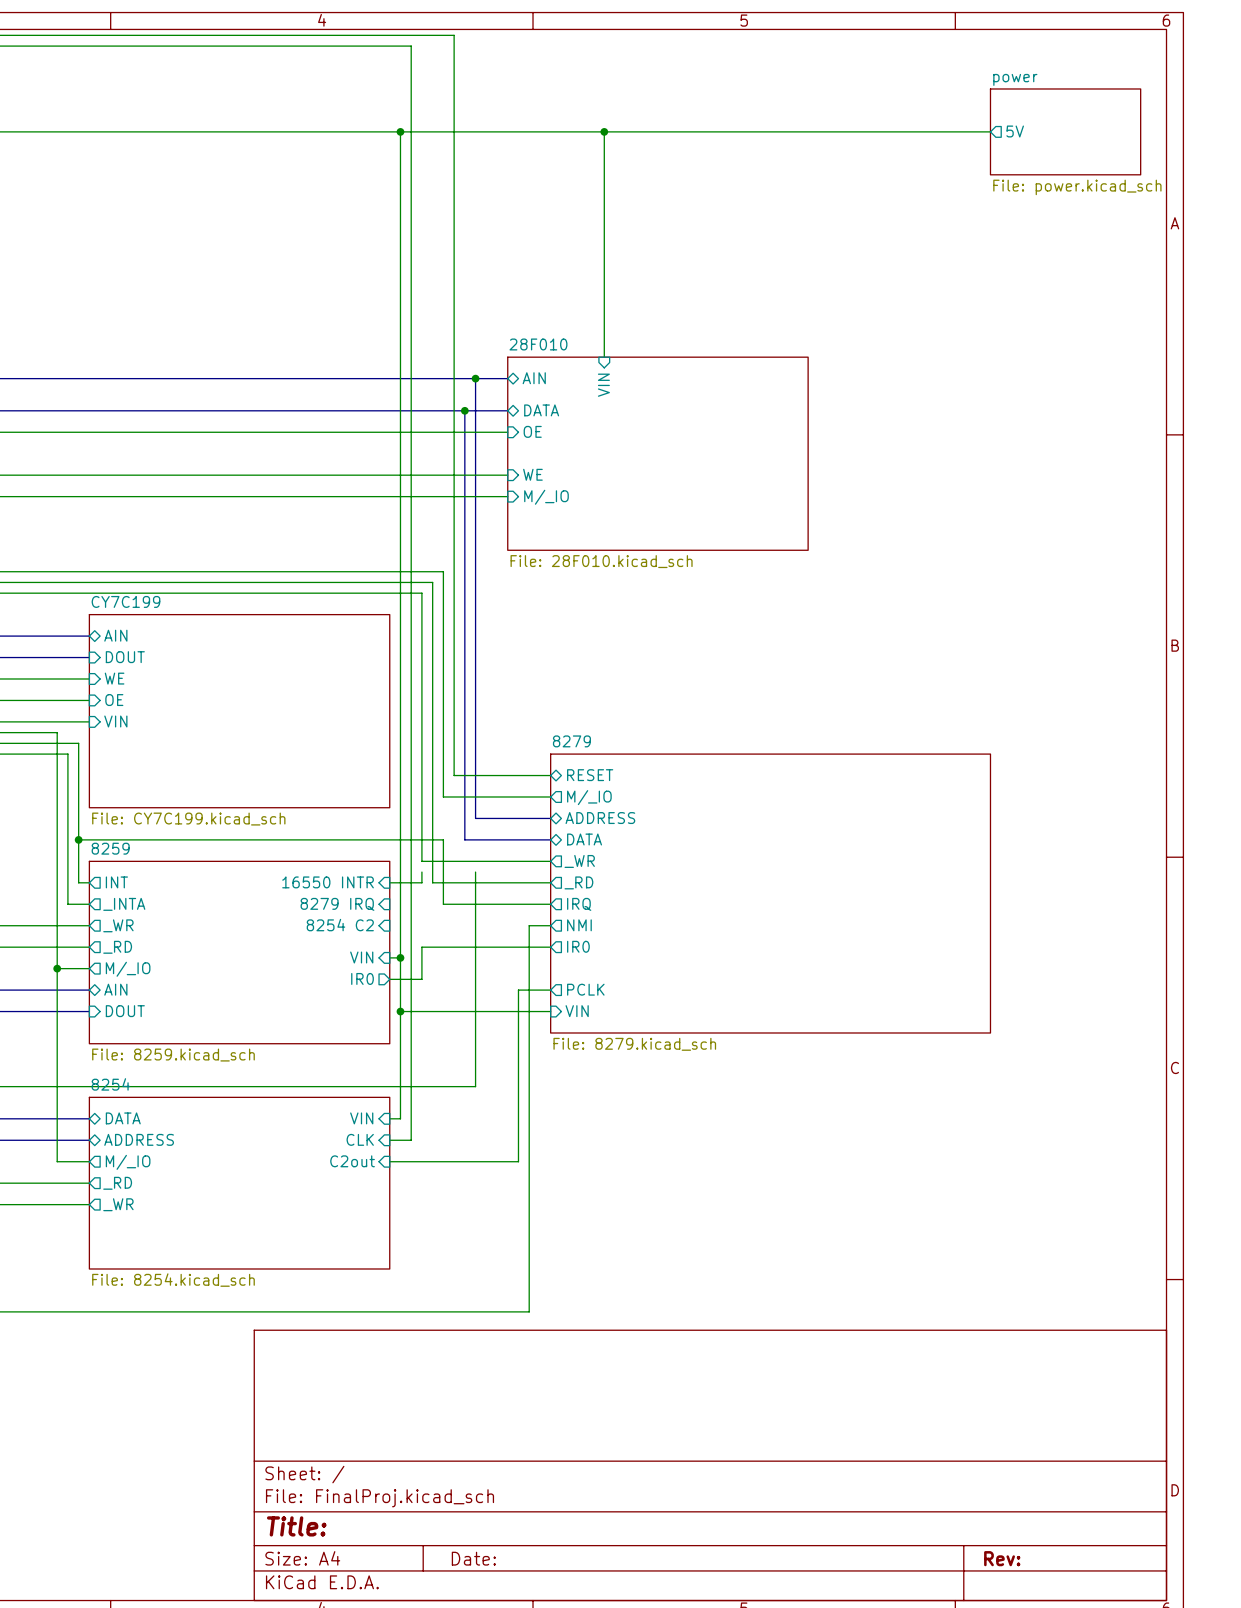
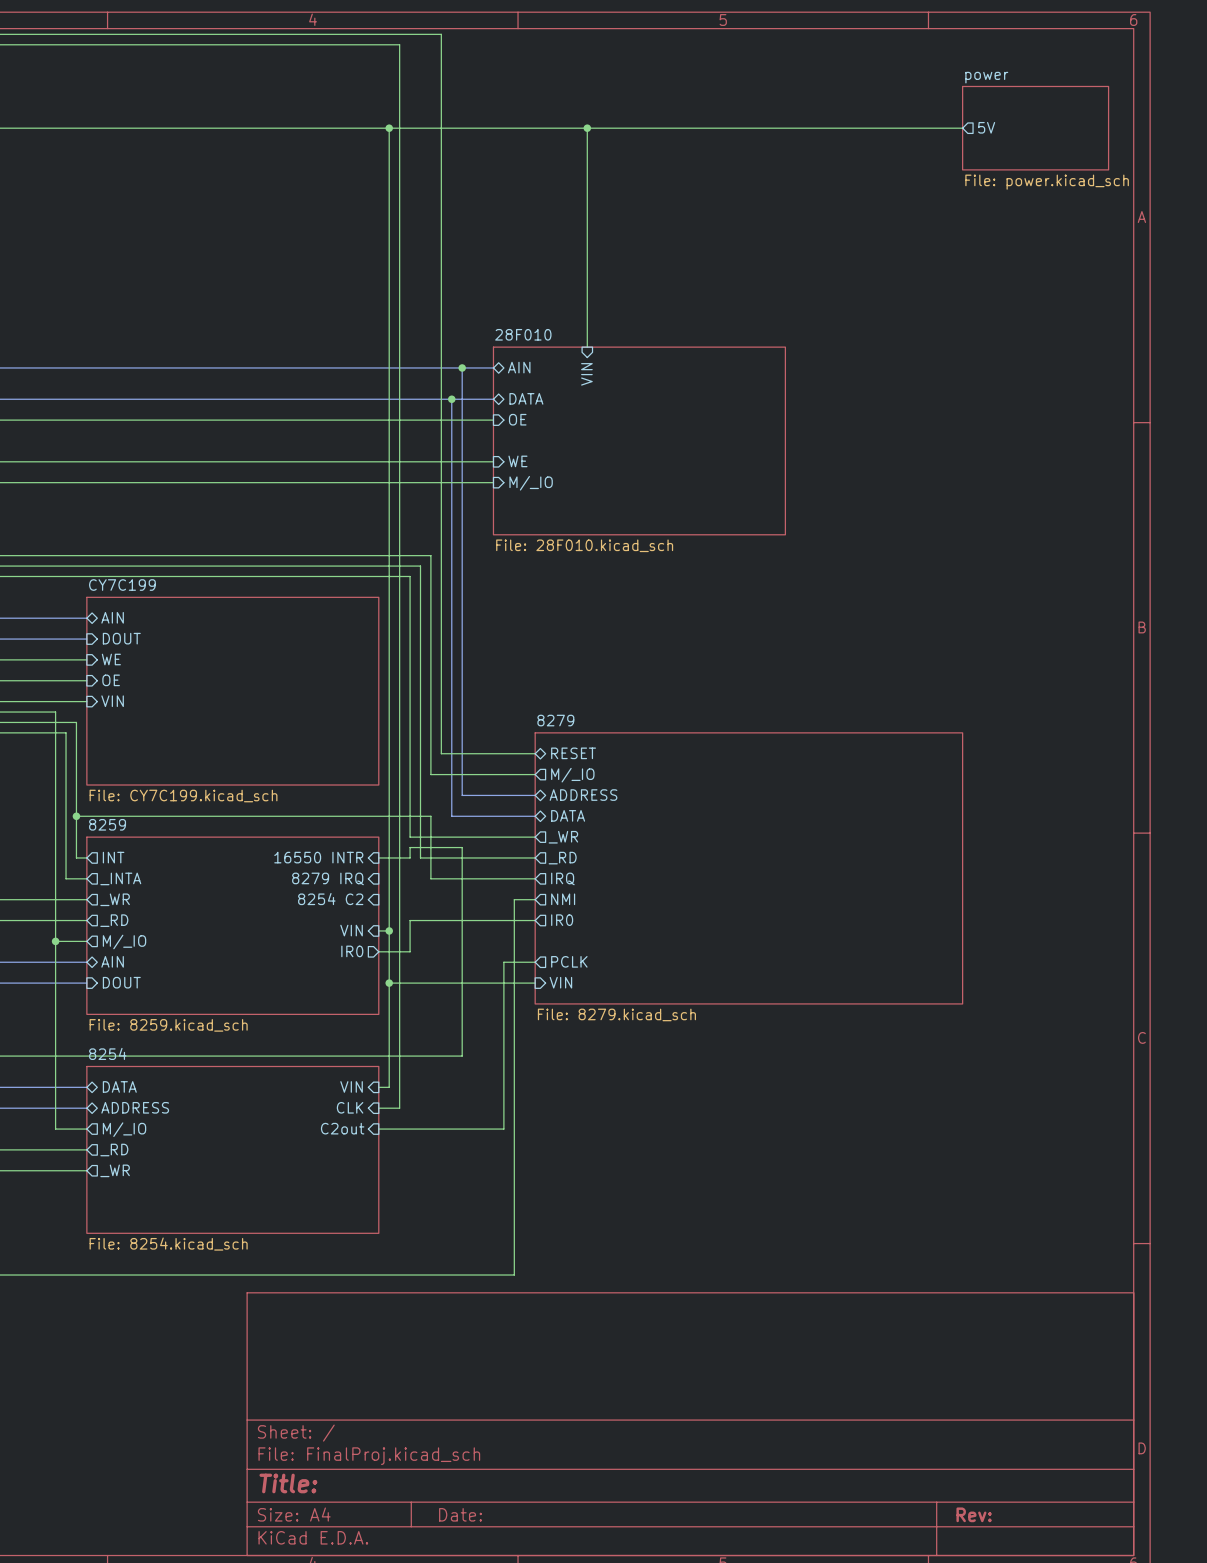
wire: none -> (410, 847) (462, 847)

